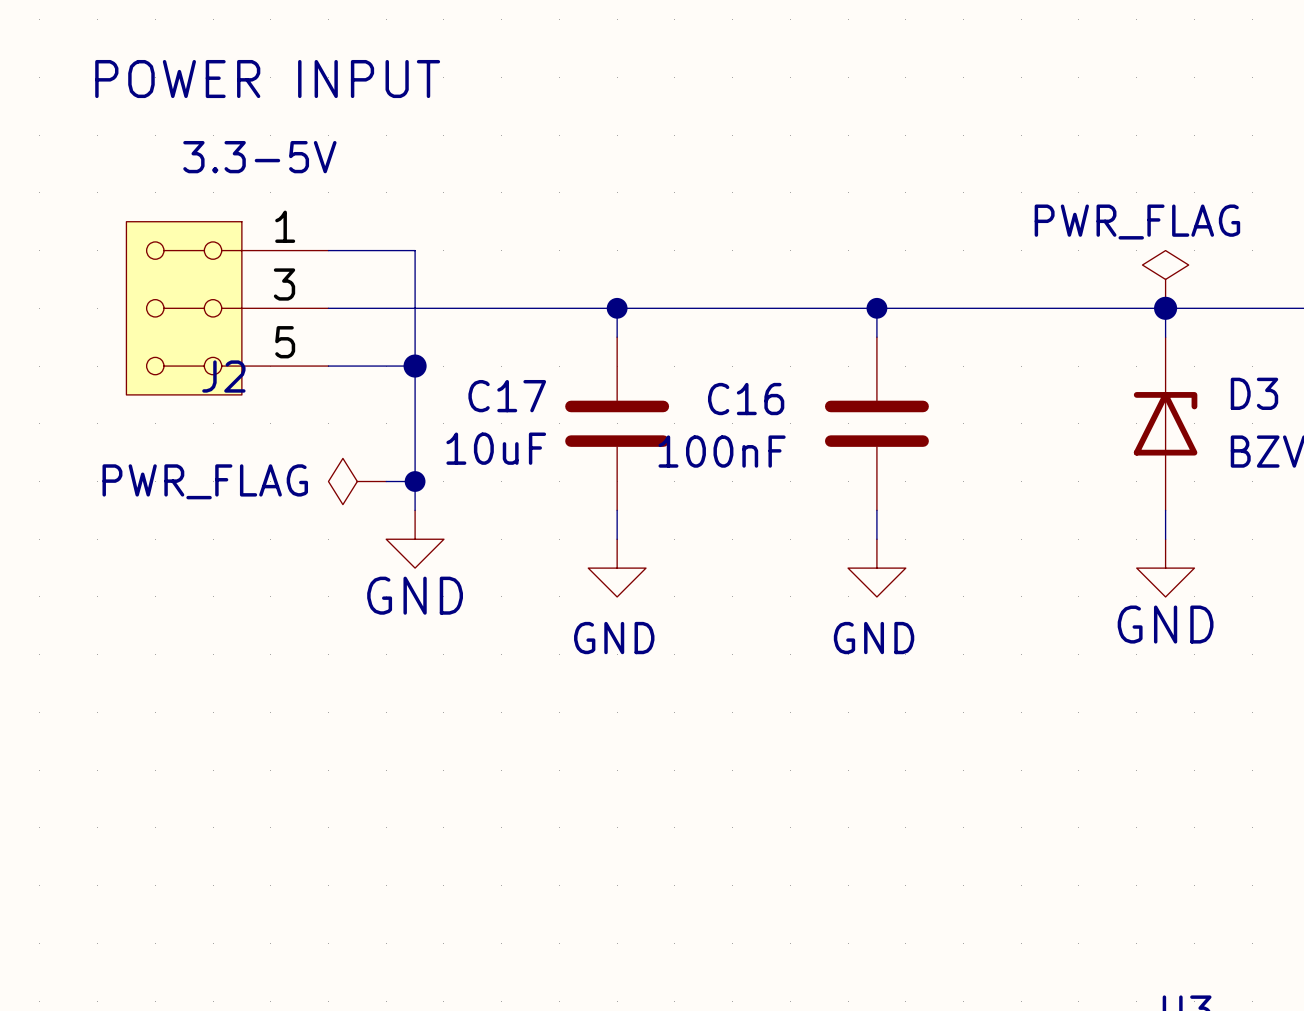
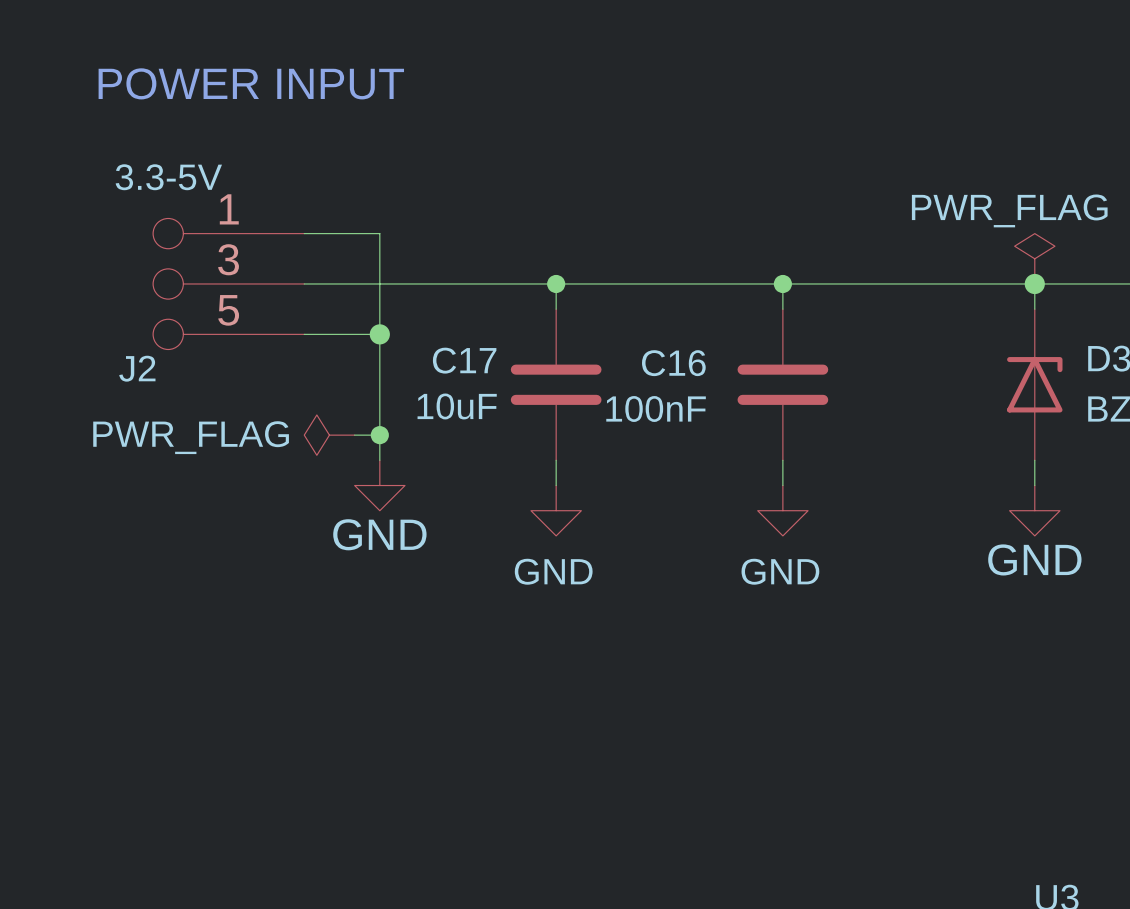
J2 value position: 3.3-5V (259, 157) -> 3.3-5V (168, 177)
J2 symbol: [126, 221, 329, 395] -> [153, 218, 305, 350]
J2 name position: J2 (223, 376) -> J2 (137, 368)

